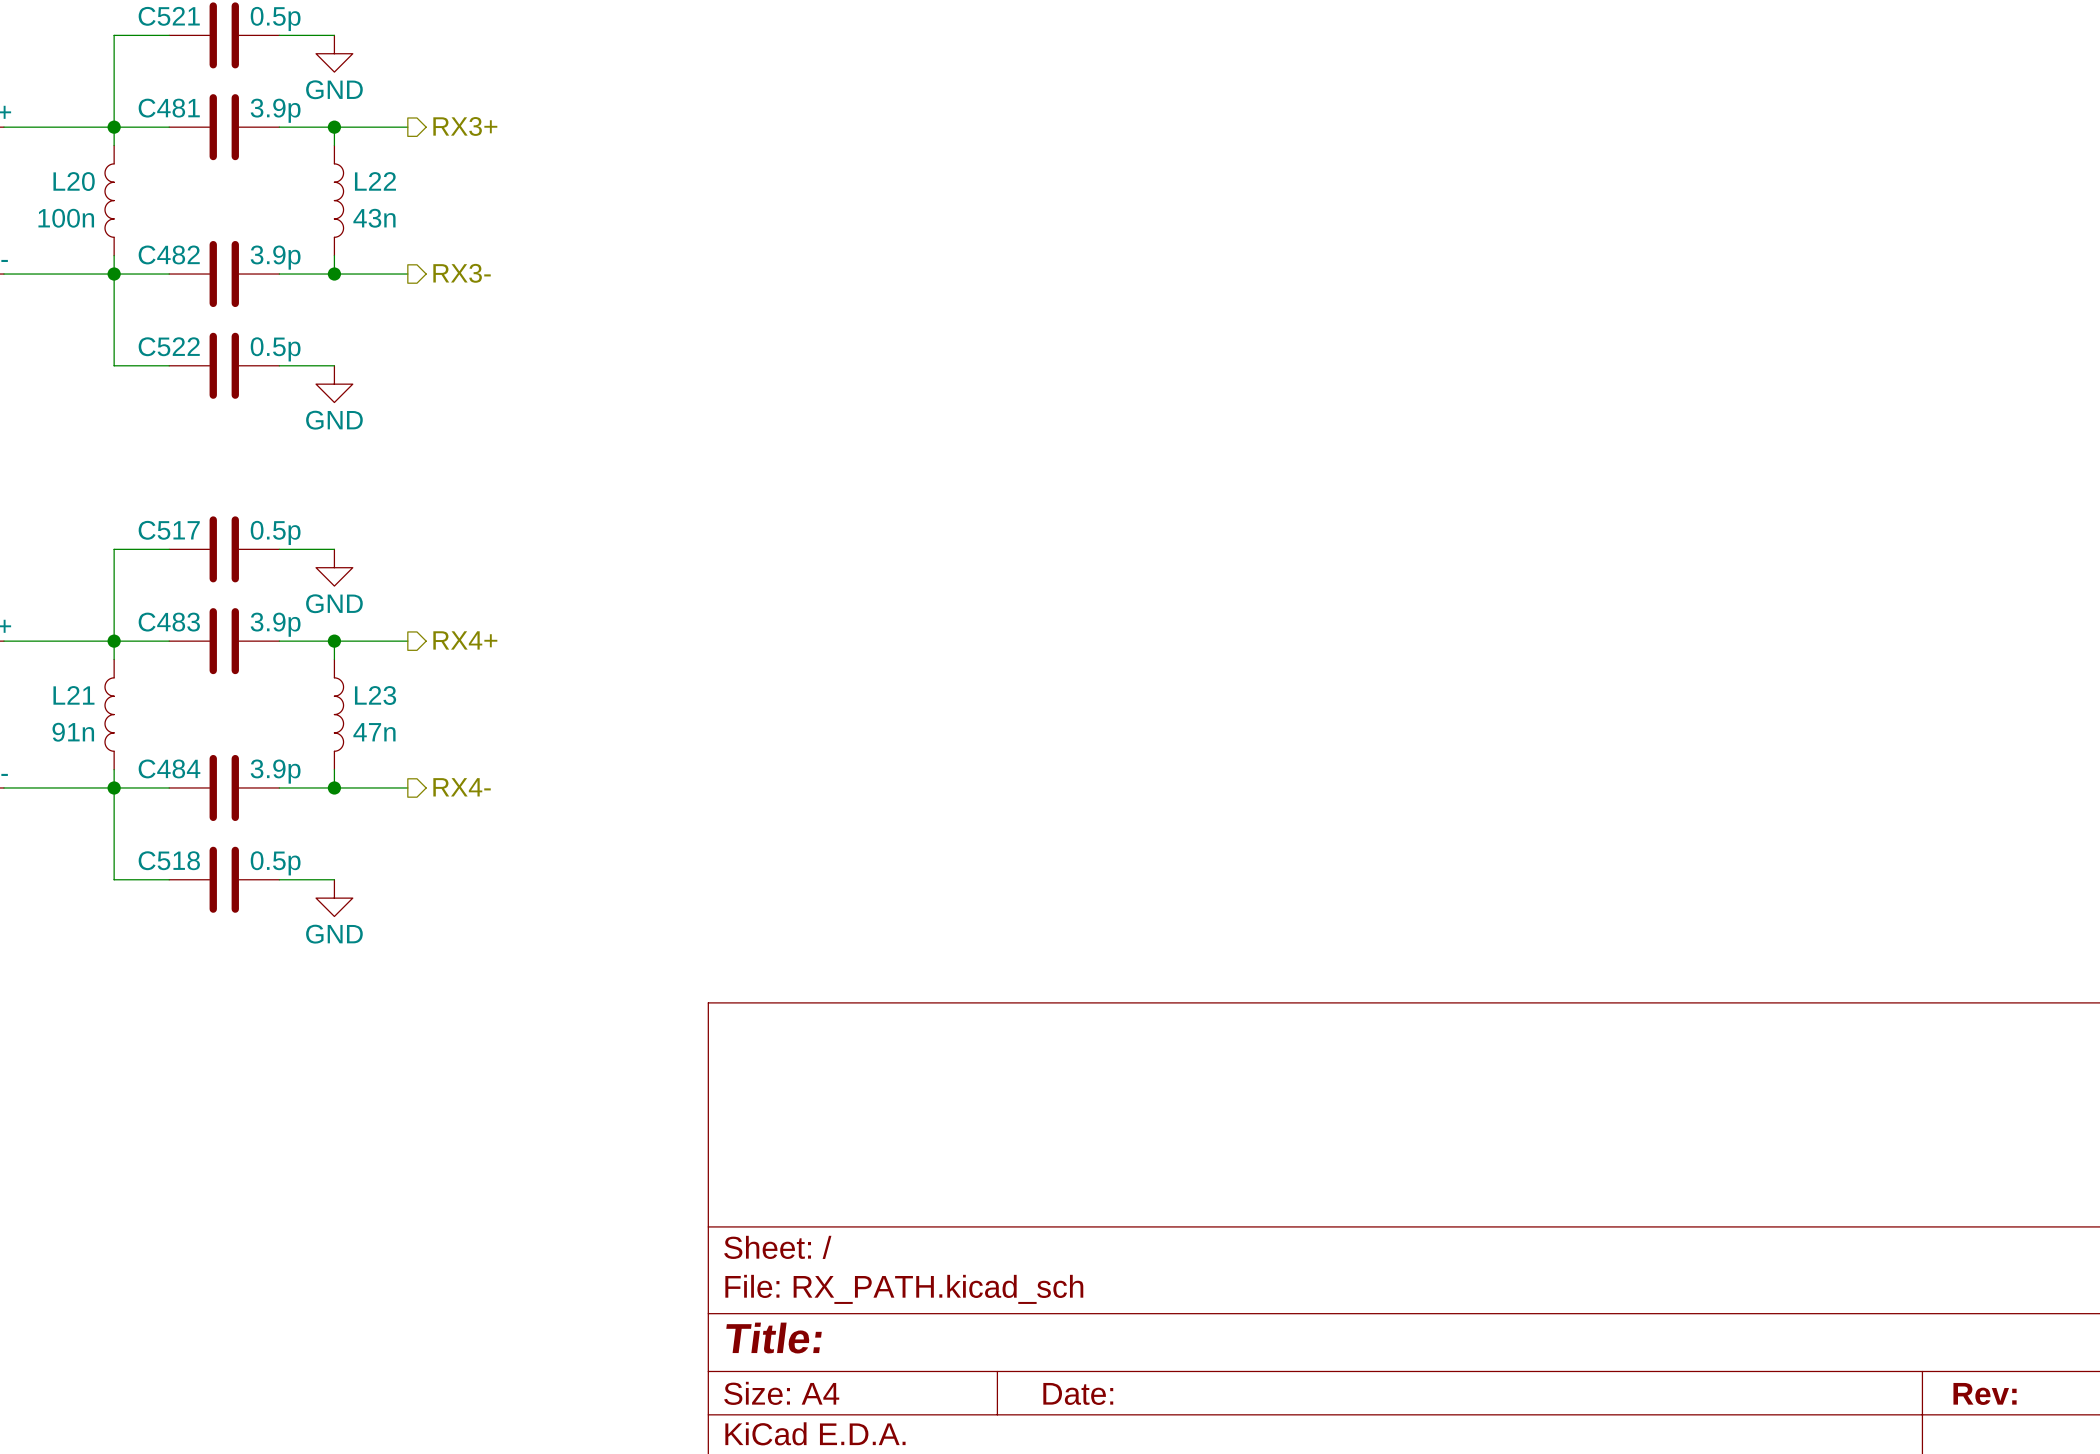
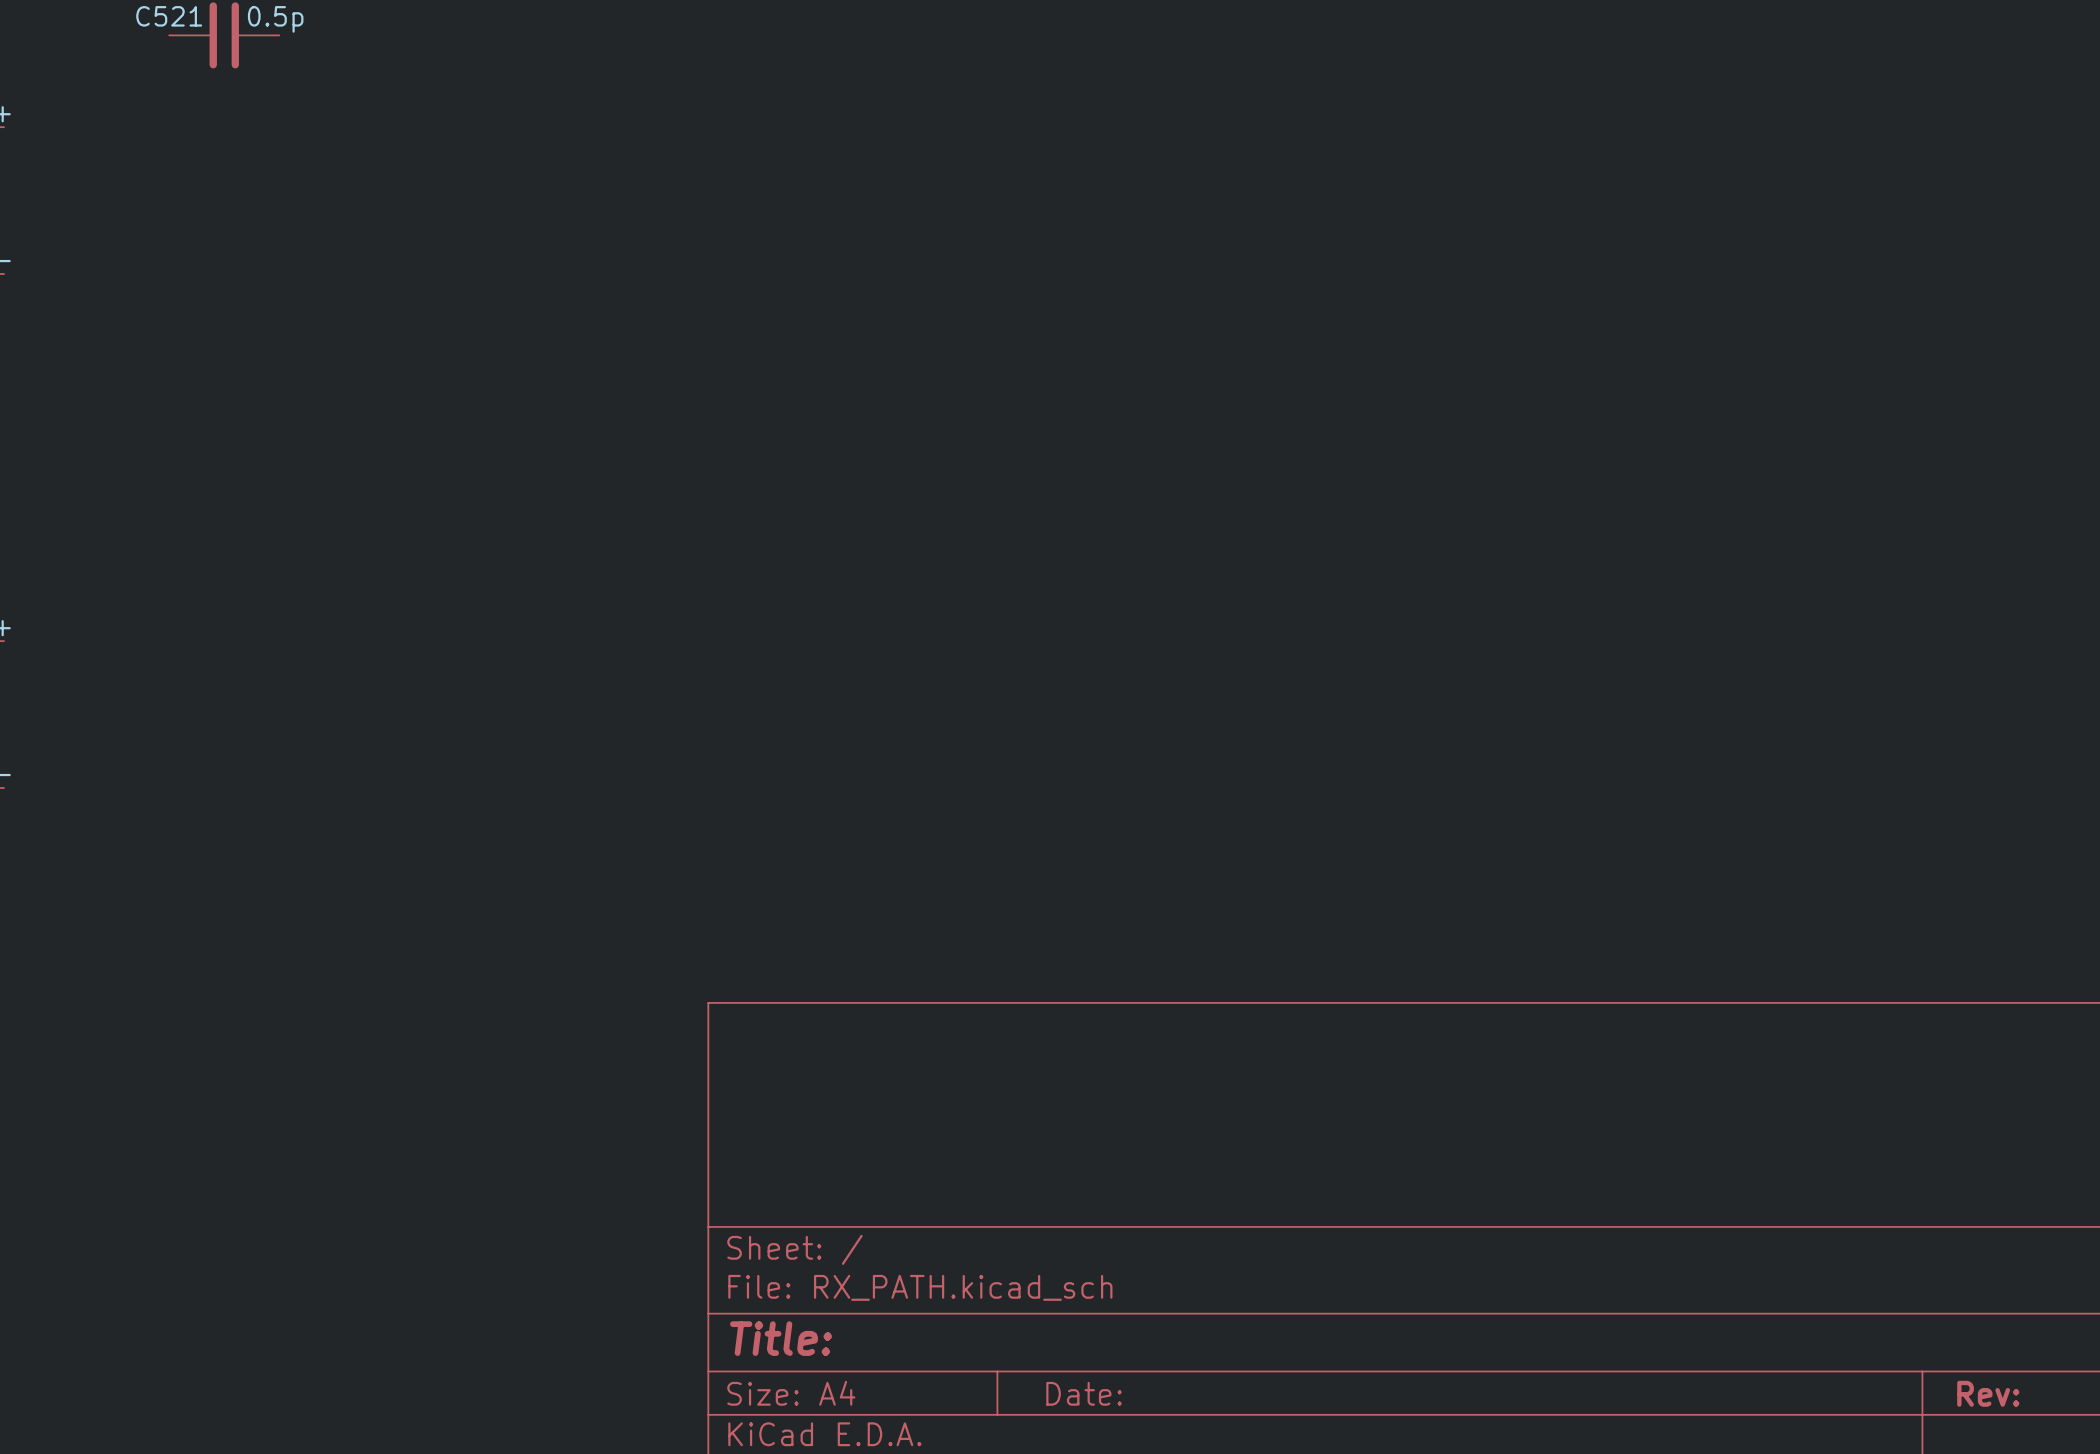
wire: (169, 35) (114, 35) (114, 145) -> none
wire: (279, 35) (334, 35) -> none
power symbol: GND (334, 53) -> none
hierarchical label: RX3+ (465, 126) -> none
wire: (4, 127) (169, 127) -> none
junction: (114, 127) -> none
C481: 3.9p (224, 127) -> none
wire: (279, 127) (407, 127) -> none
wire: (334, 127) (334, 145) -> none
junction: (334, 127) -> none
L20: 100n (109, 200) -> none
L22: 43n (338, 200) -> none
wire: (114, 255) (114, 365) (169, 365) -> none
wire: (334, 255) (334, 274) -> none
hierarchical label: RX3- (462, 273) -> none
wire: (4, 274) (169, 274) -> none
junction: (114, 274) -> none
C482: 3.9p (224, 274) -> none
wire: (279, 274) (407, 274) -> none
junction: (334, 274) -> none
C522: 0.5p (224, 365) -> none
wire: (279, 365) (334, 365) -> none
power symbol: GND (334, 384) -> none
wire: (169, 549) (114, 549) (114, 659) -> none
C517: 0.5p (224, 549) -> none
wire: (279, 549) (334, 549) -> none
power symbol: GND (334, 567) -> none
hierarchical label: RX4+ (465, 640) -> none
wire: (4, 641) (169, 641) -> none
junction: (114, 641) -> none
C483: 3.9p (224, 641) -> none
wire: (279, 641) (407, 641) -> none
wire: (334, 641) (334, 659) -> none
junction: (334, 641) -> none
L21: 91n (109, 714) -> none
L23: 47n (338, 714) -> none
wire: (114, 769) (114, 879) (169, 879) -> none
wire: (334, 769) (334, 787) -> none
wire: (4, 787) (169, 787) -> none
junction: (114, 787) -> none
C484: 3.9p (224, 787) -> none
wire: (279, 787) (407, 787) -> none
junction: (334, 787) -> none
hierarchical label: RX4- (462, 787) -> none
C518: 0.5p (224, 879) -> none
wire: (279, 879) (334, 879) -> none
power symbol: GND (334, 898) -> none

